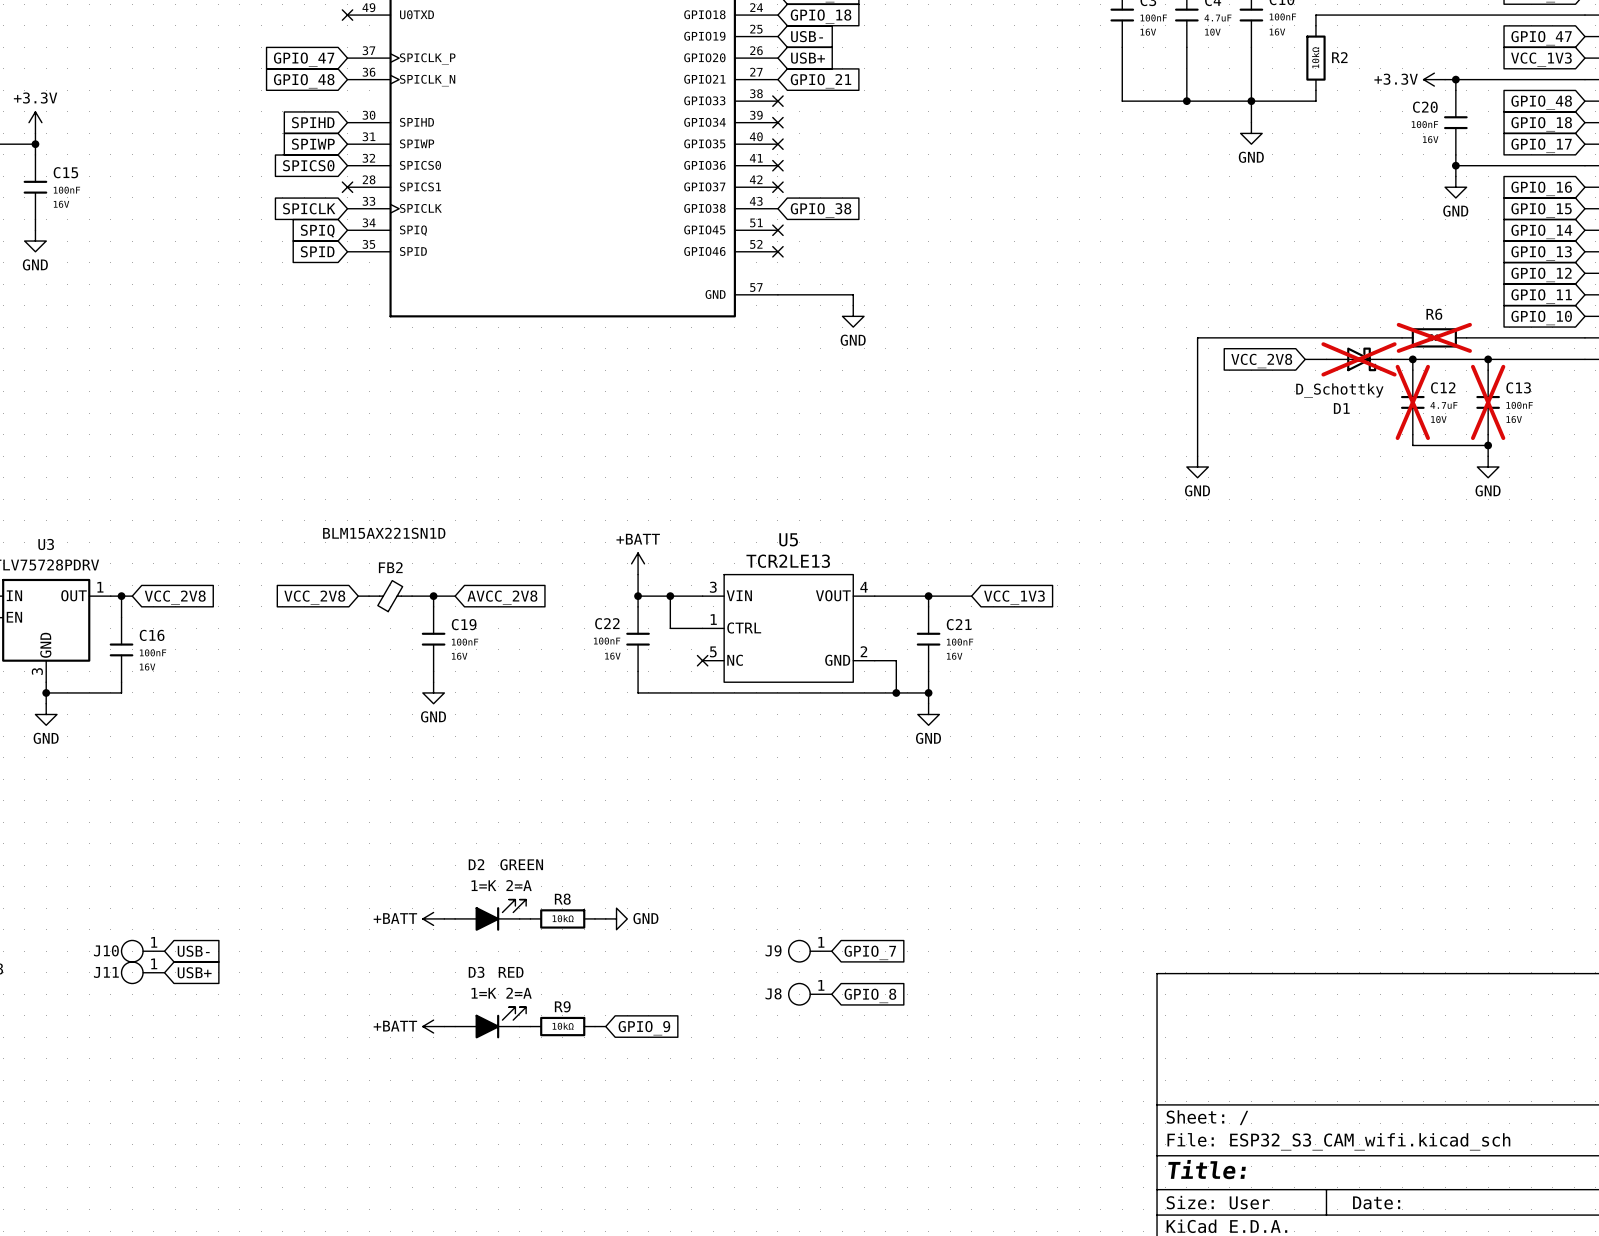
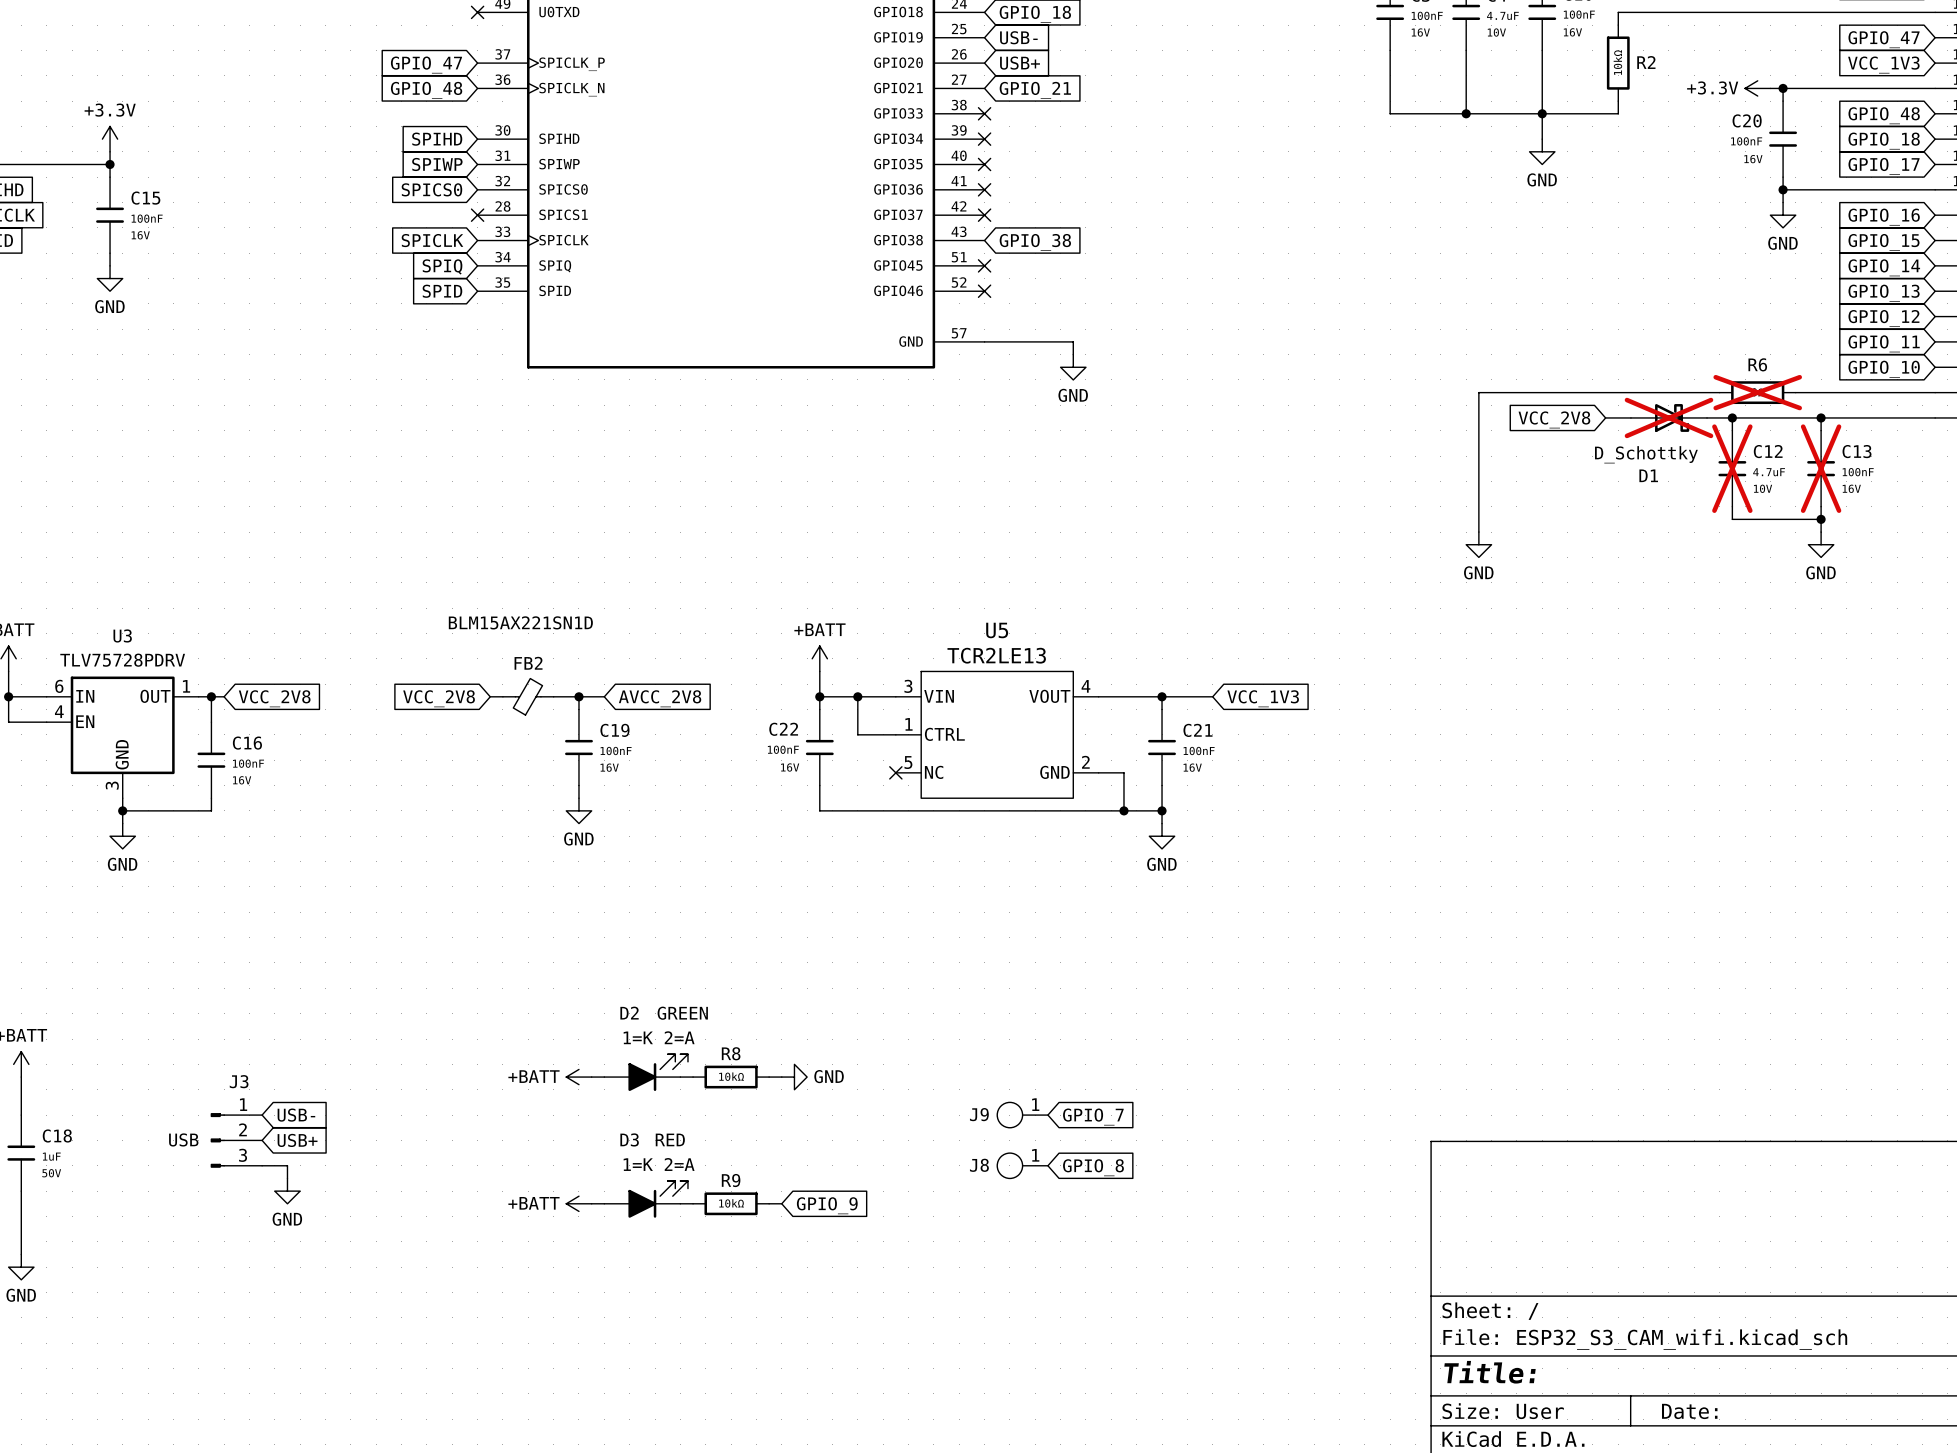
J10: (143, 951) -> none
J3: none -> USB (236, 1140)
J11: (143, 972) -> none
wire: none -> (262, 1165) (287, 1165) (287, 1178)
power symbol: none -> GND (287, 1191)

